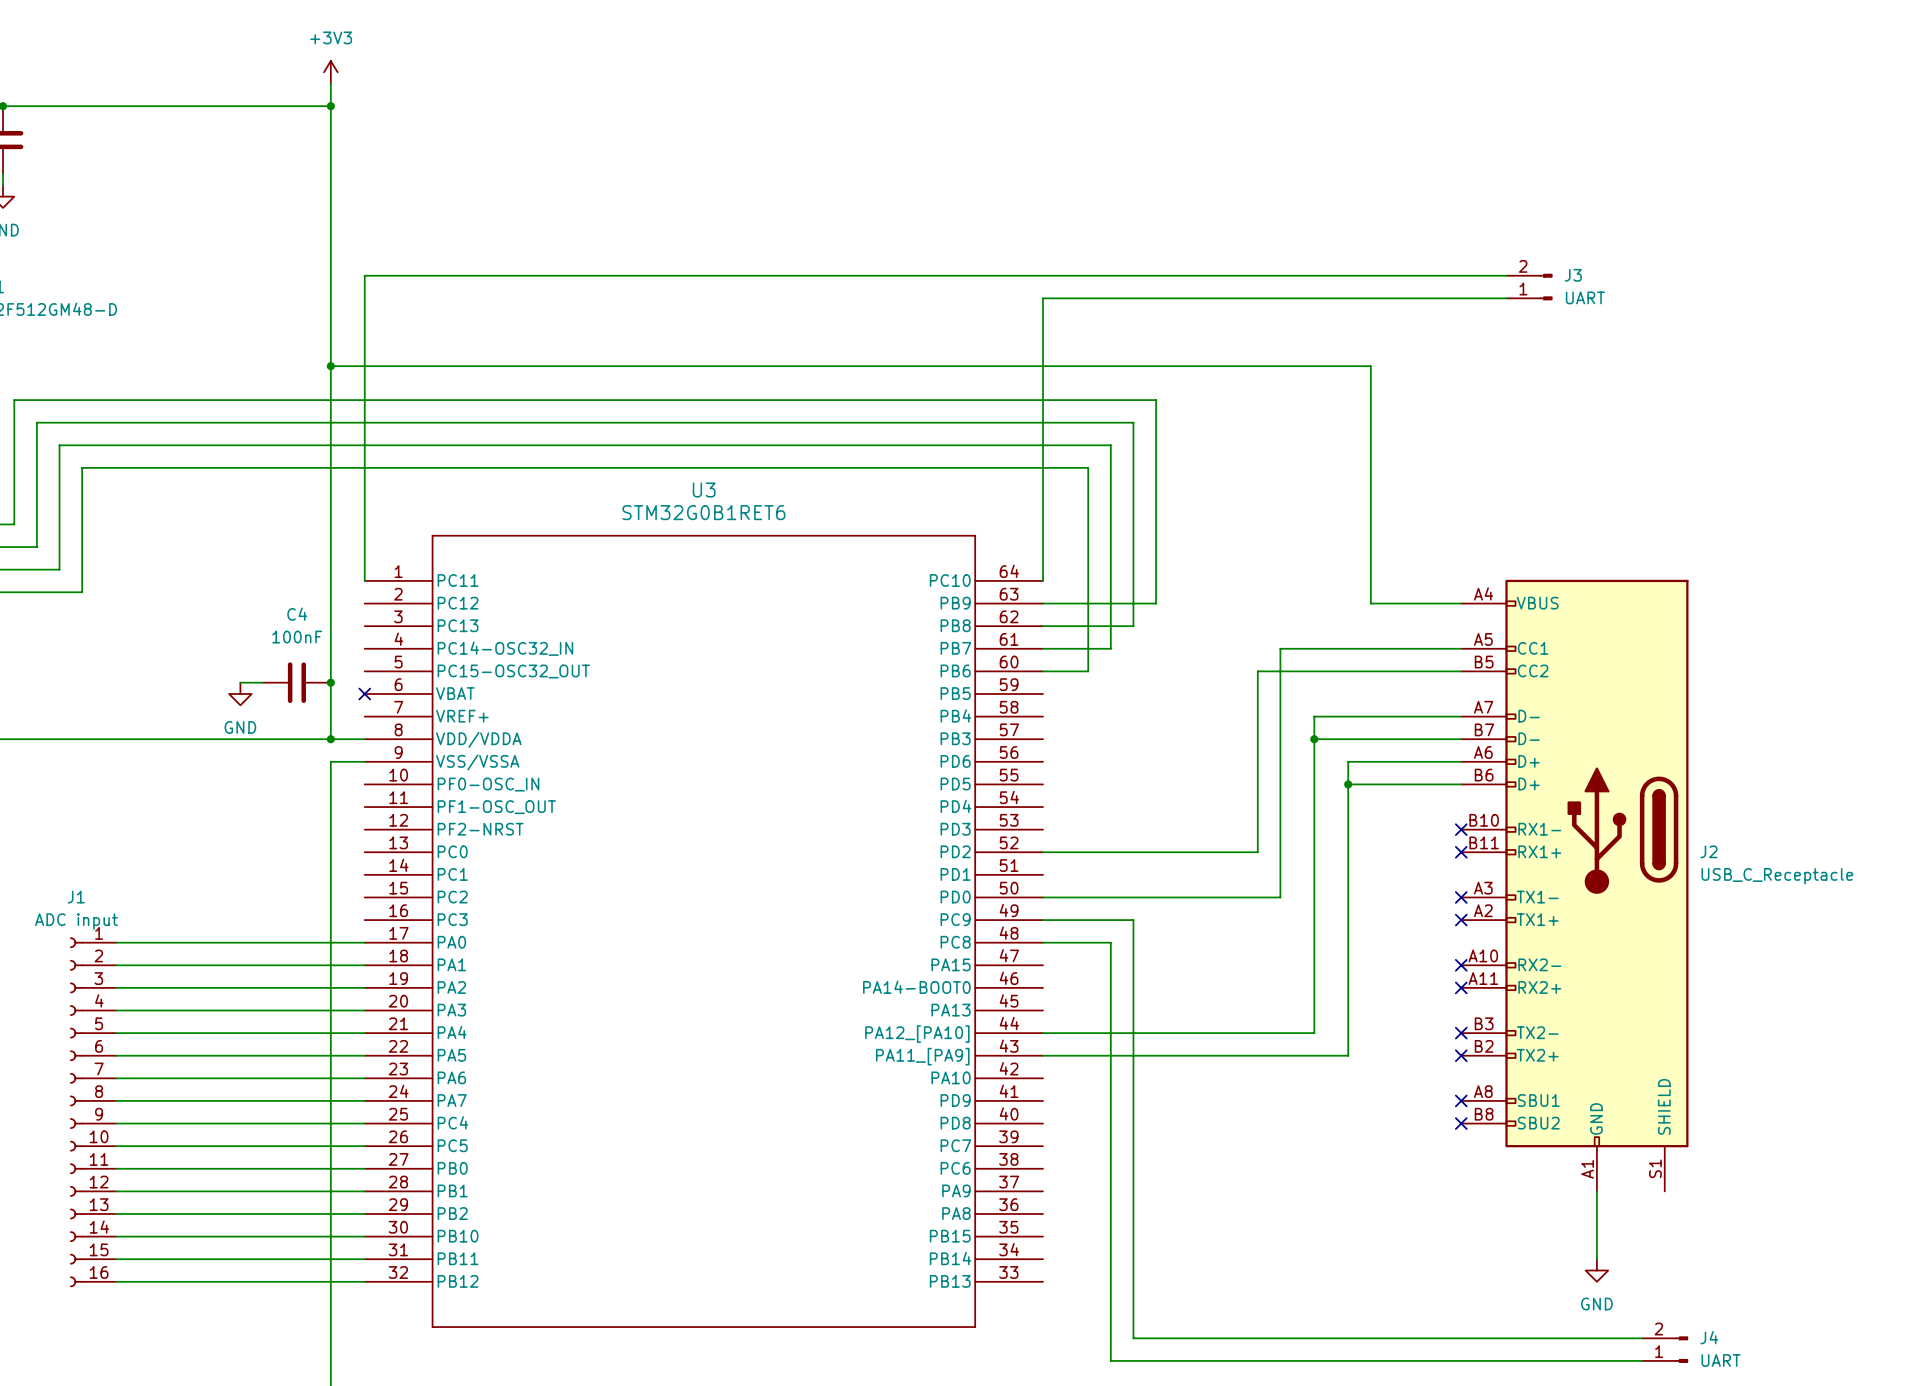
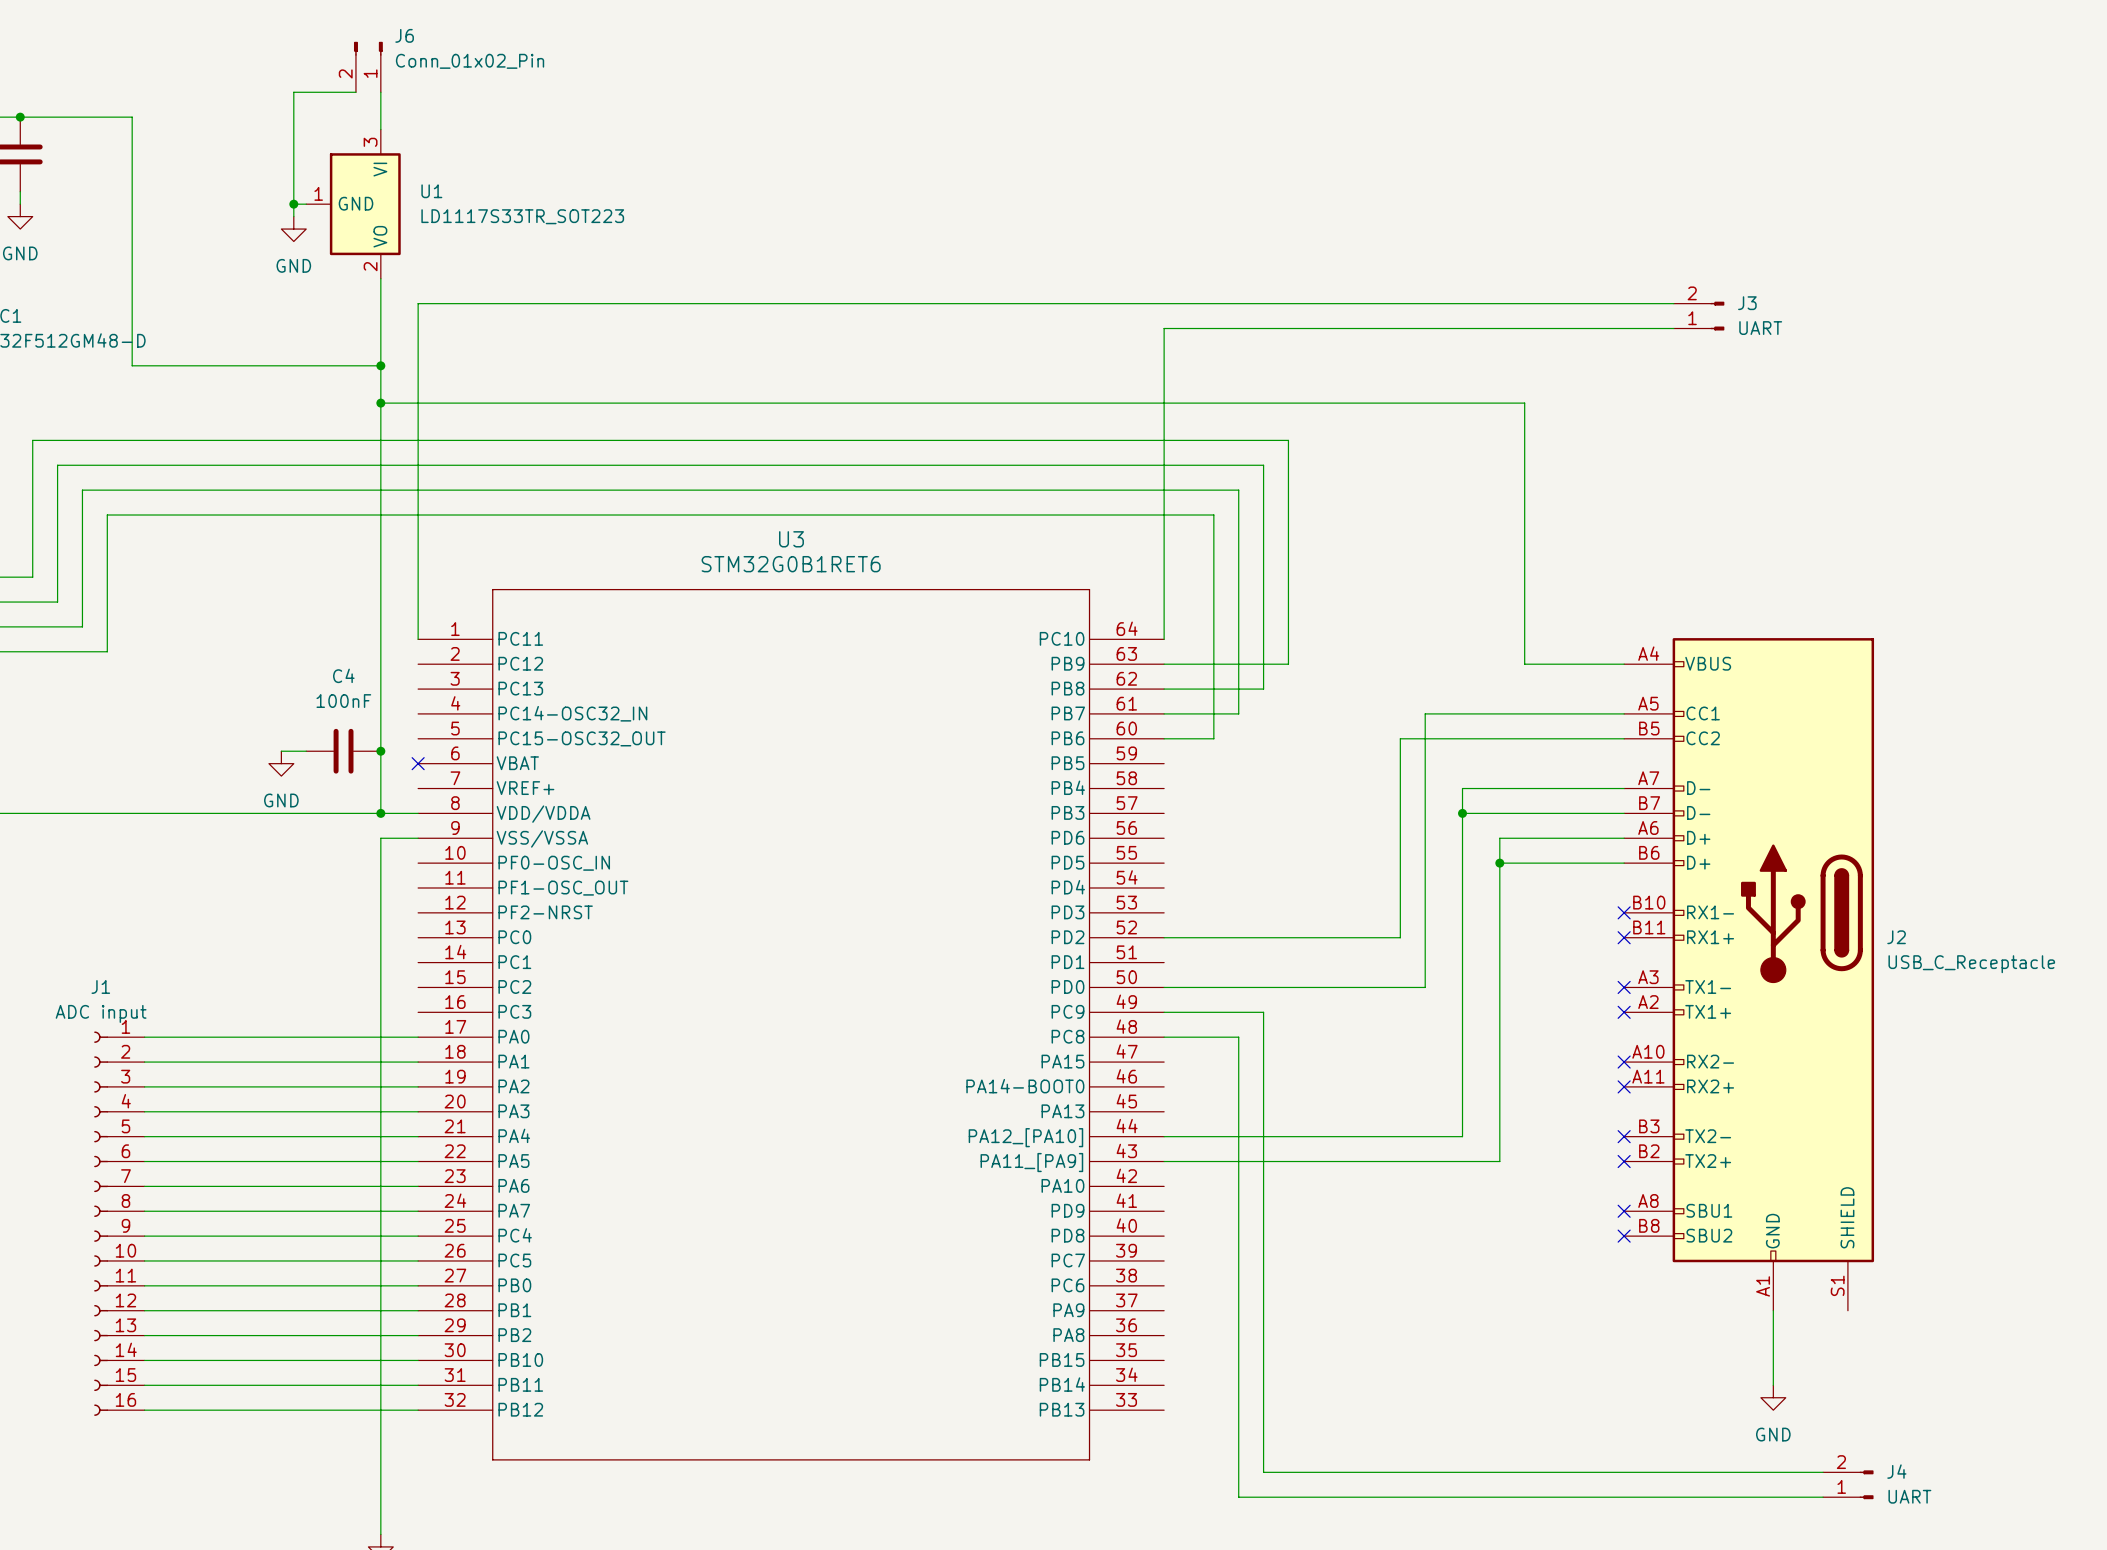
J6: none -> Conn_01x02_Pin (368, 67)
power symbol: +3V3 (330, 72) -> none
wire: none -> (355, 92) (293, 92) (293, 216)
wire: (104, 106) (330, 106) -> (132, 117) (132, 365) (380, 365)
junction: (330, 106) -> none
wire: none -> (293, 204) (306, 204)
junction: none -> (293, 204)
U1: none -> LD1117S33TR_SOT223 (353, 204)
power symbol: none -> GND (293, 229)
junction: none -> (380, 365)

